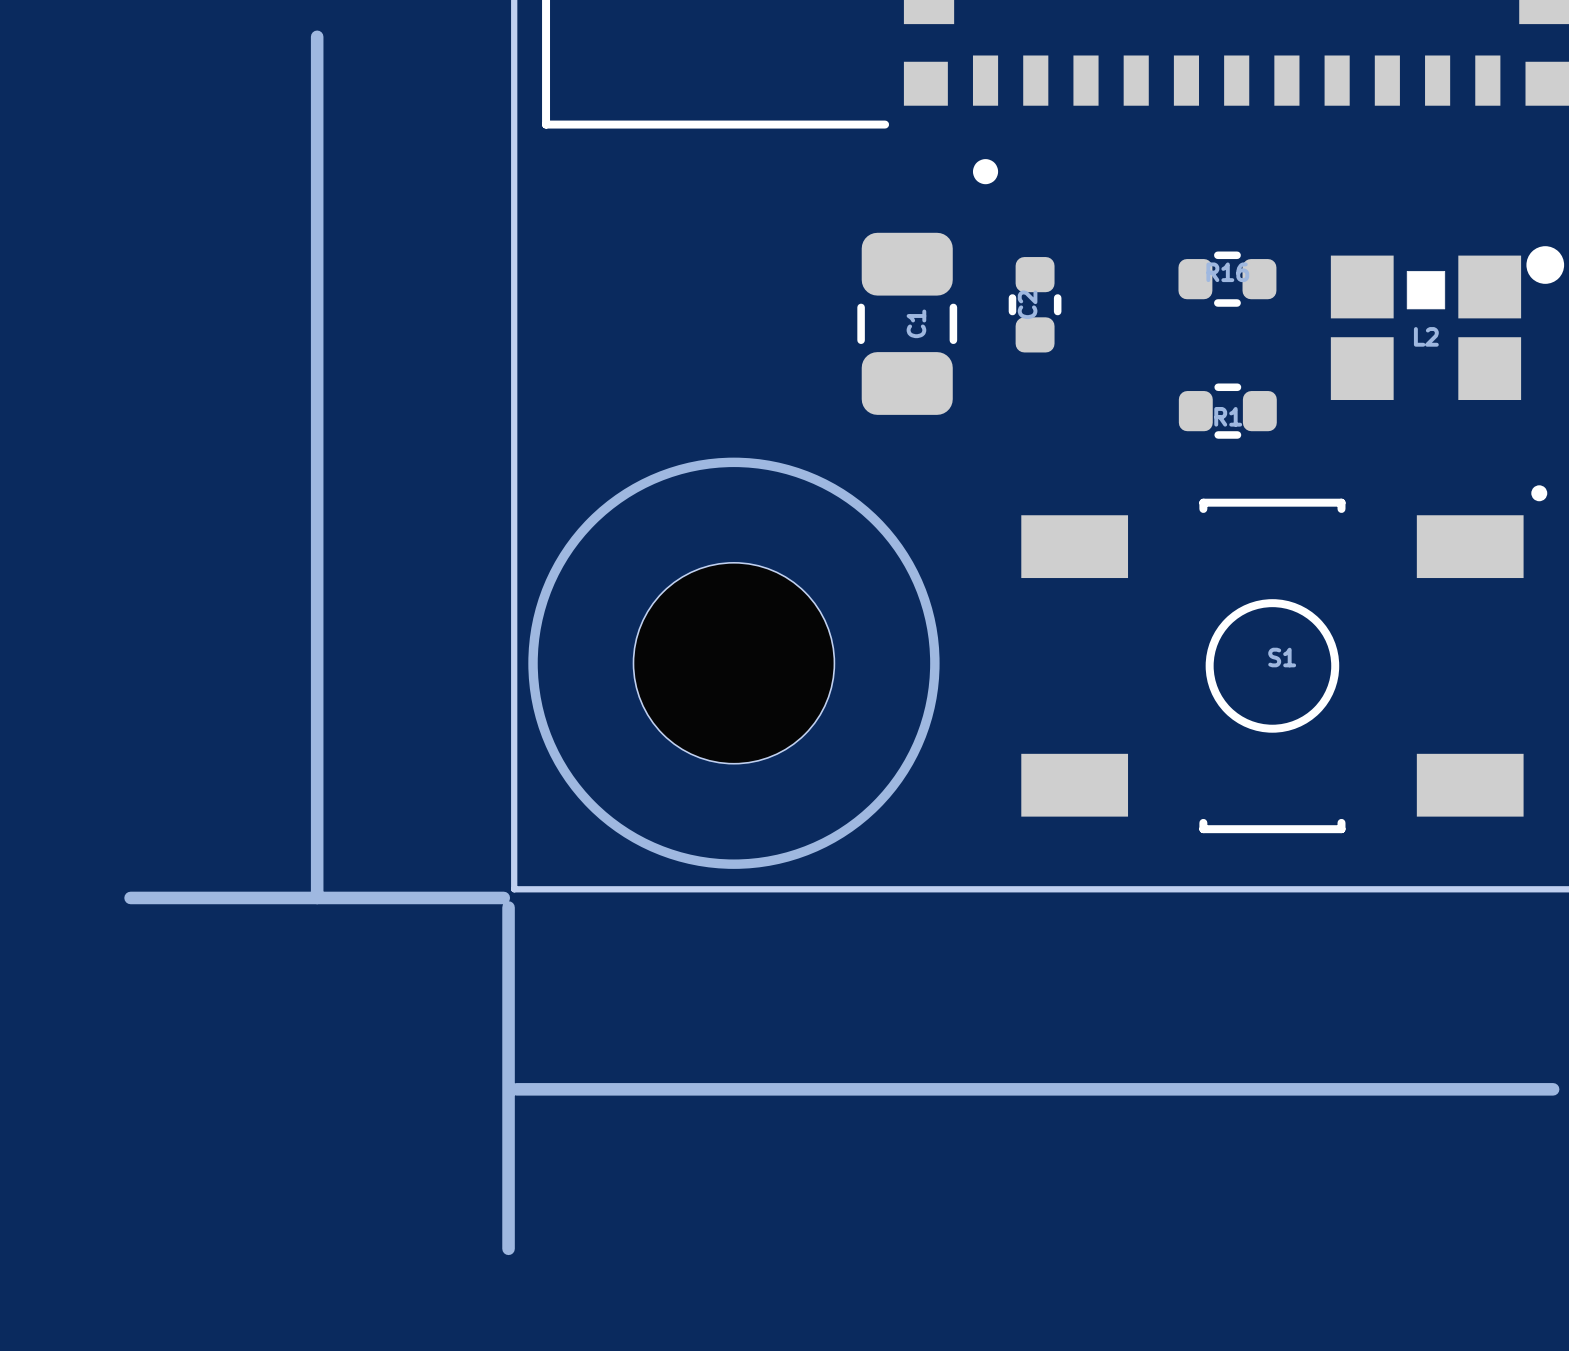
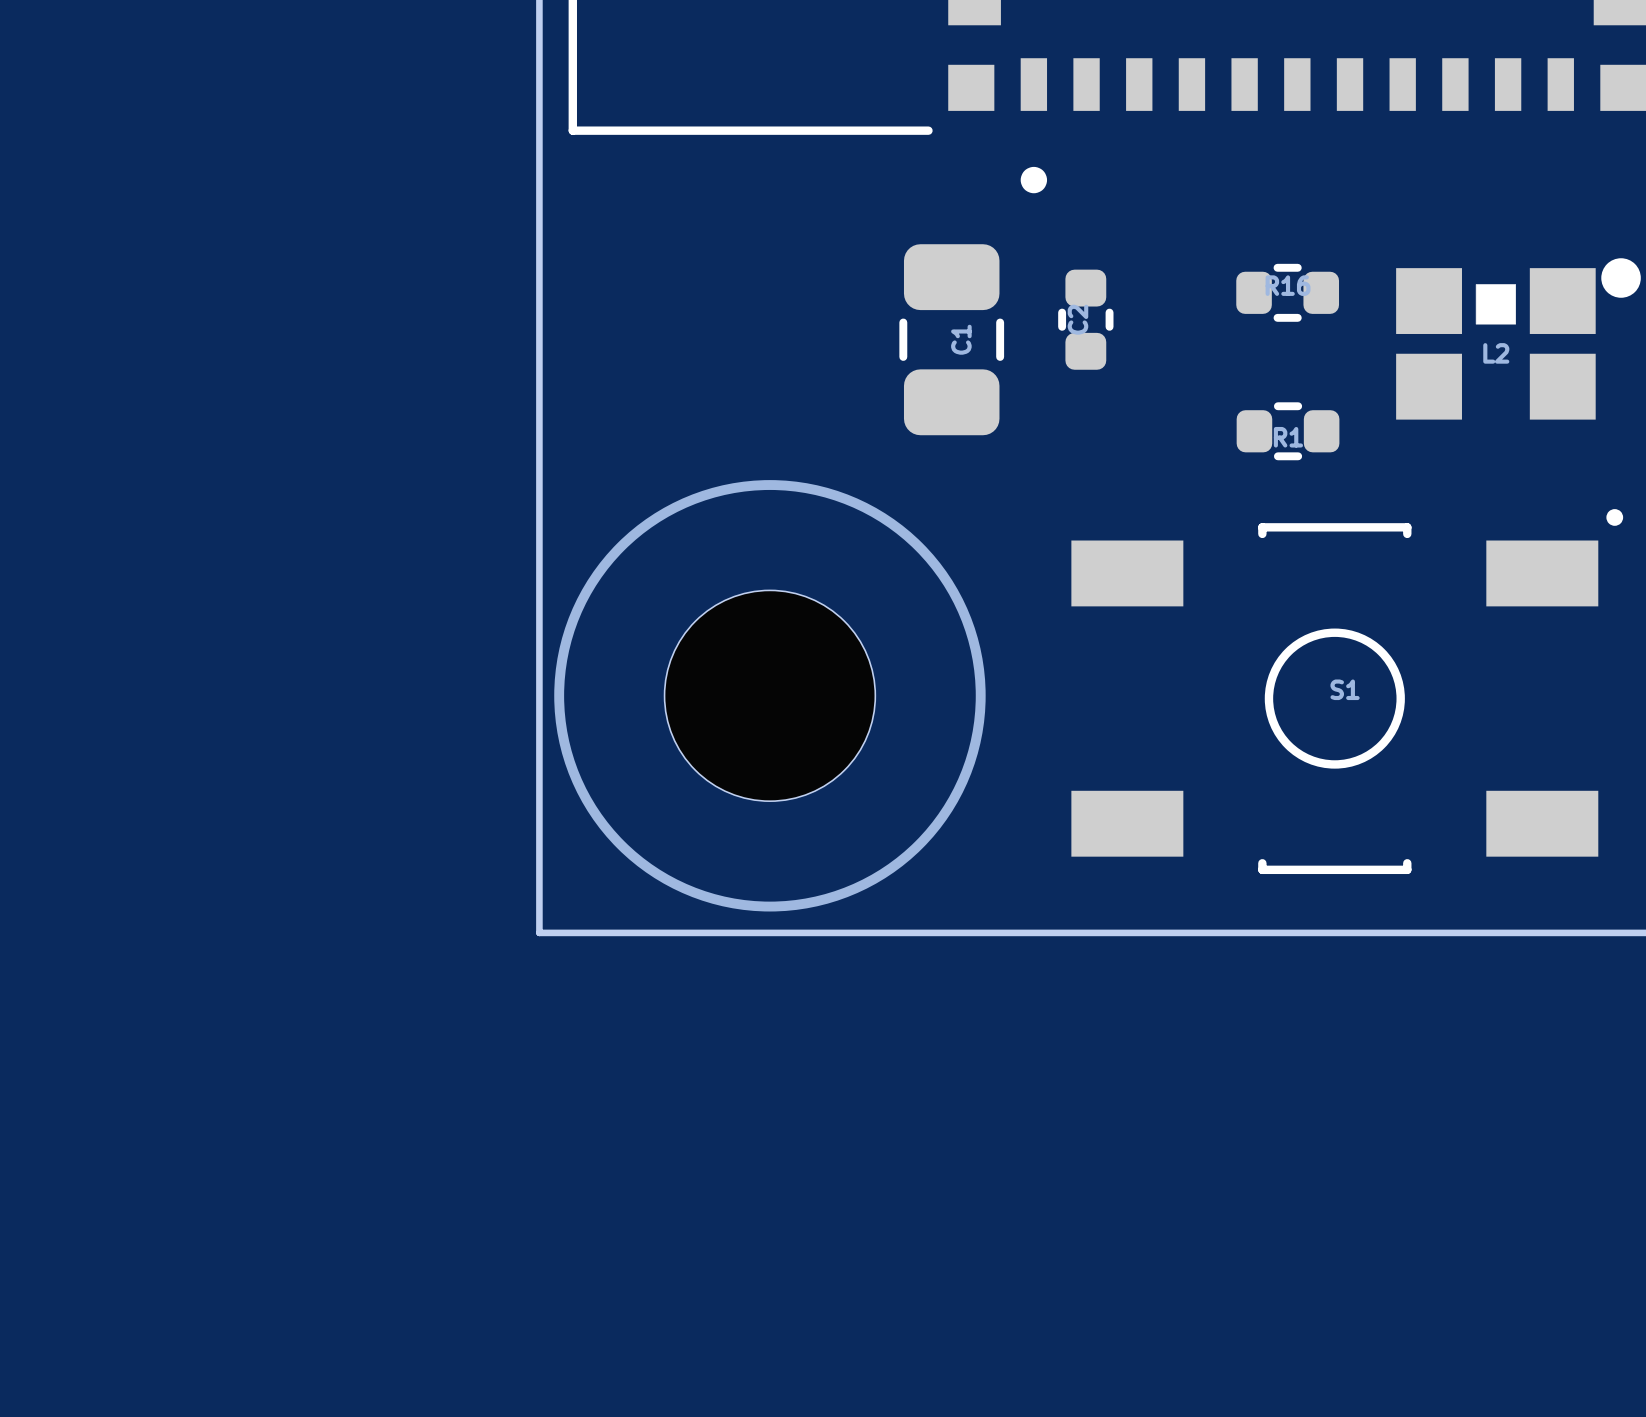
line: (317, 36) (317, 897) -> none
line: (130, 897) (503, 897) -> none
line: (508, 907) (508, 1248) -> none
line: (516, 1089) (1553, 1089) -> none

